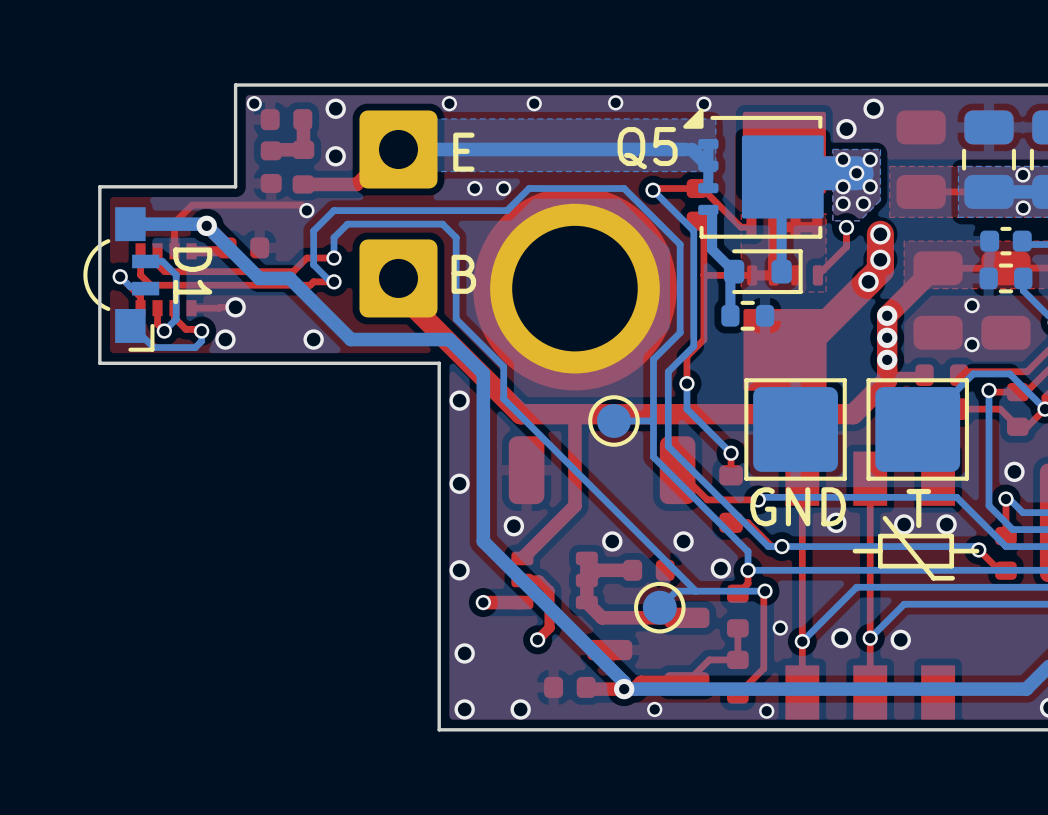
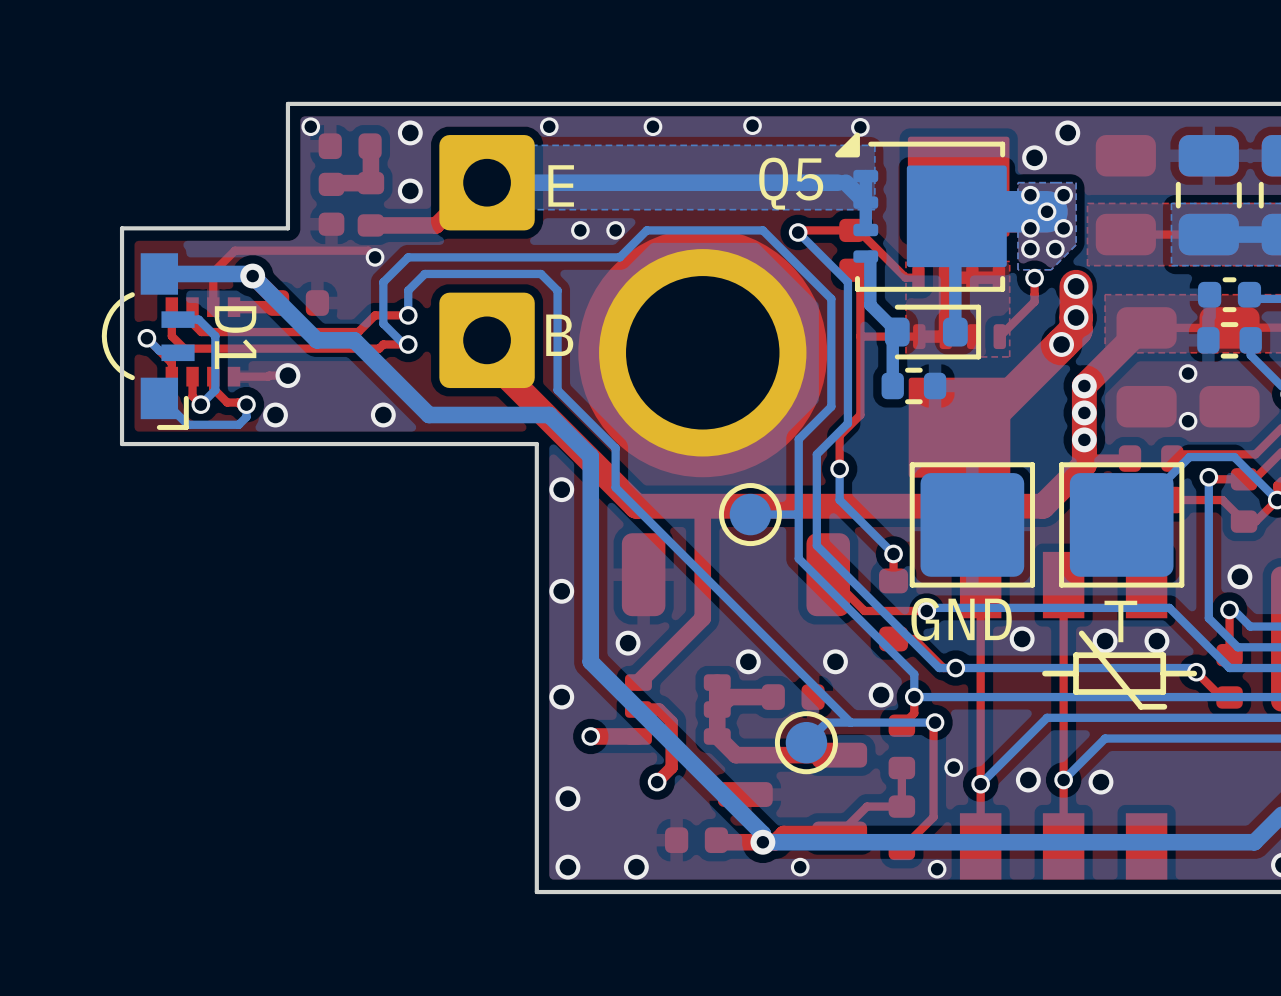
via: (1022, 174) -> none
via: (1023, 208) -> none

